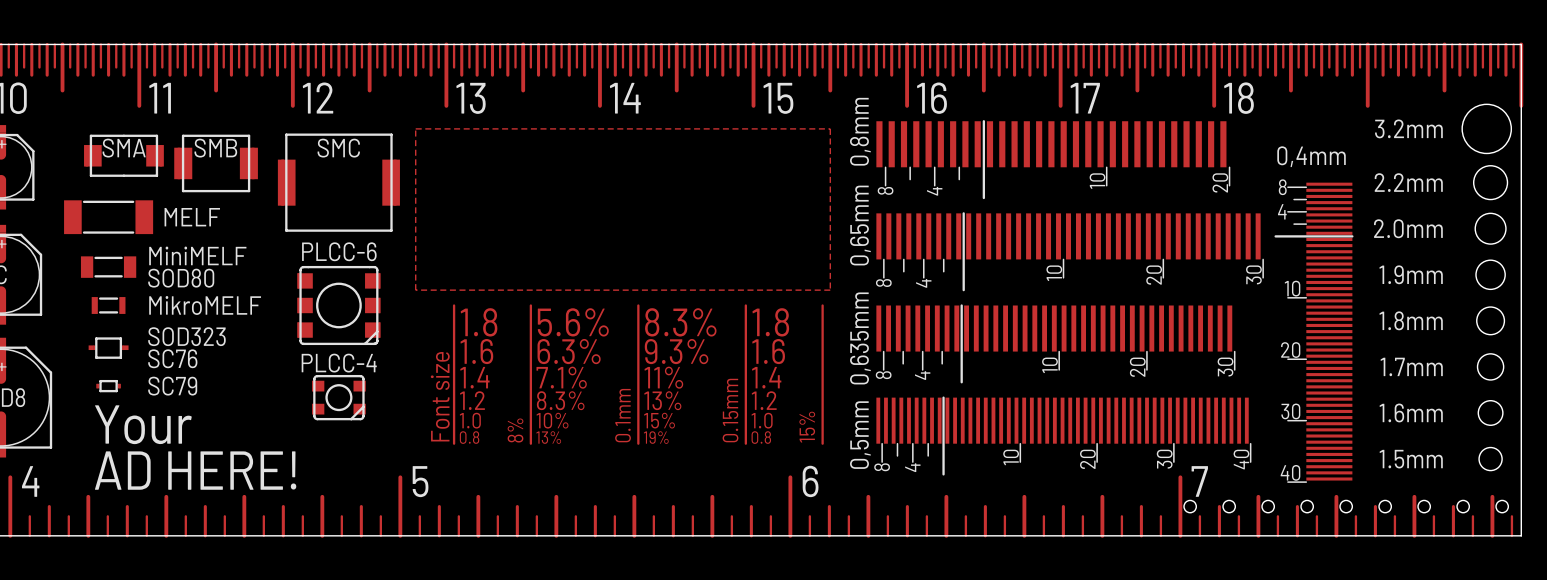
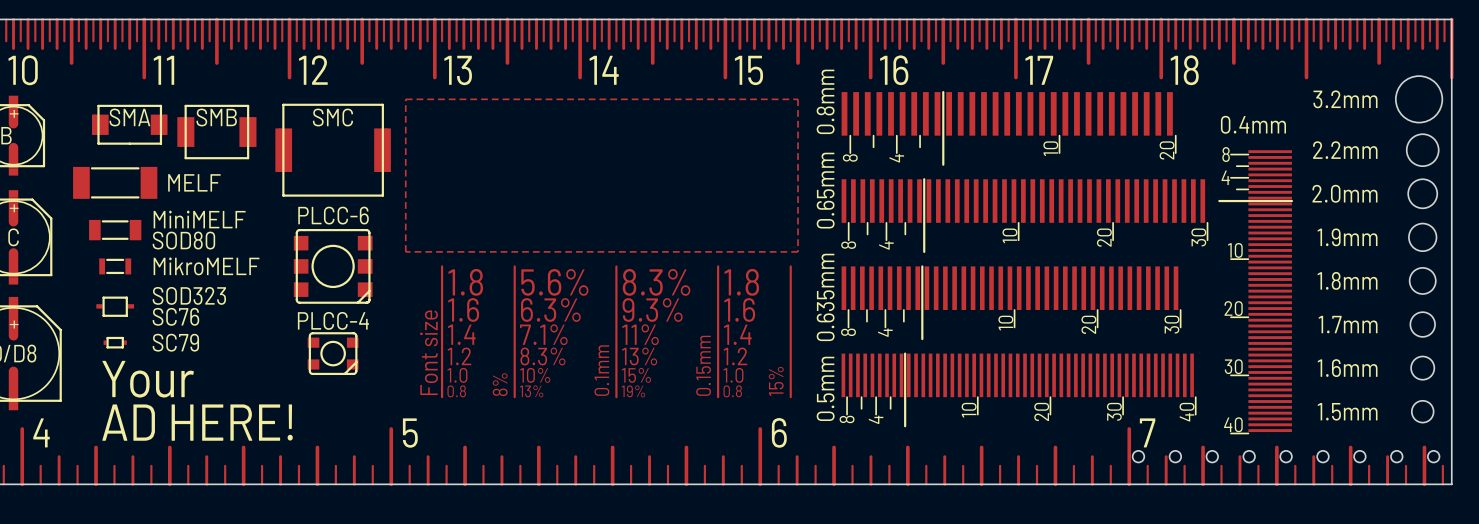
text: 0,8mm (860, 131) -> 0.8mm (825, 101)
text: 0,4mm (1311, 156) -> 0.4mm (1253, 124)
text: 0,65mm (860, 225) -> 0.65mm (825, 190)
text: 0,635mm (860, 338) -> 0.635mm (825, 297)
text: 0,5mm (860, 435) -> 0.5mm (825, 388)

